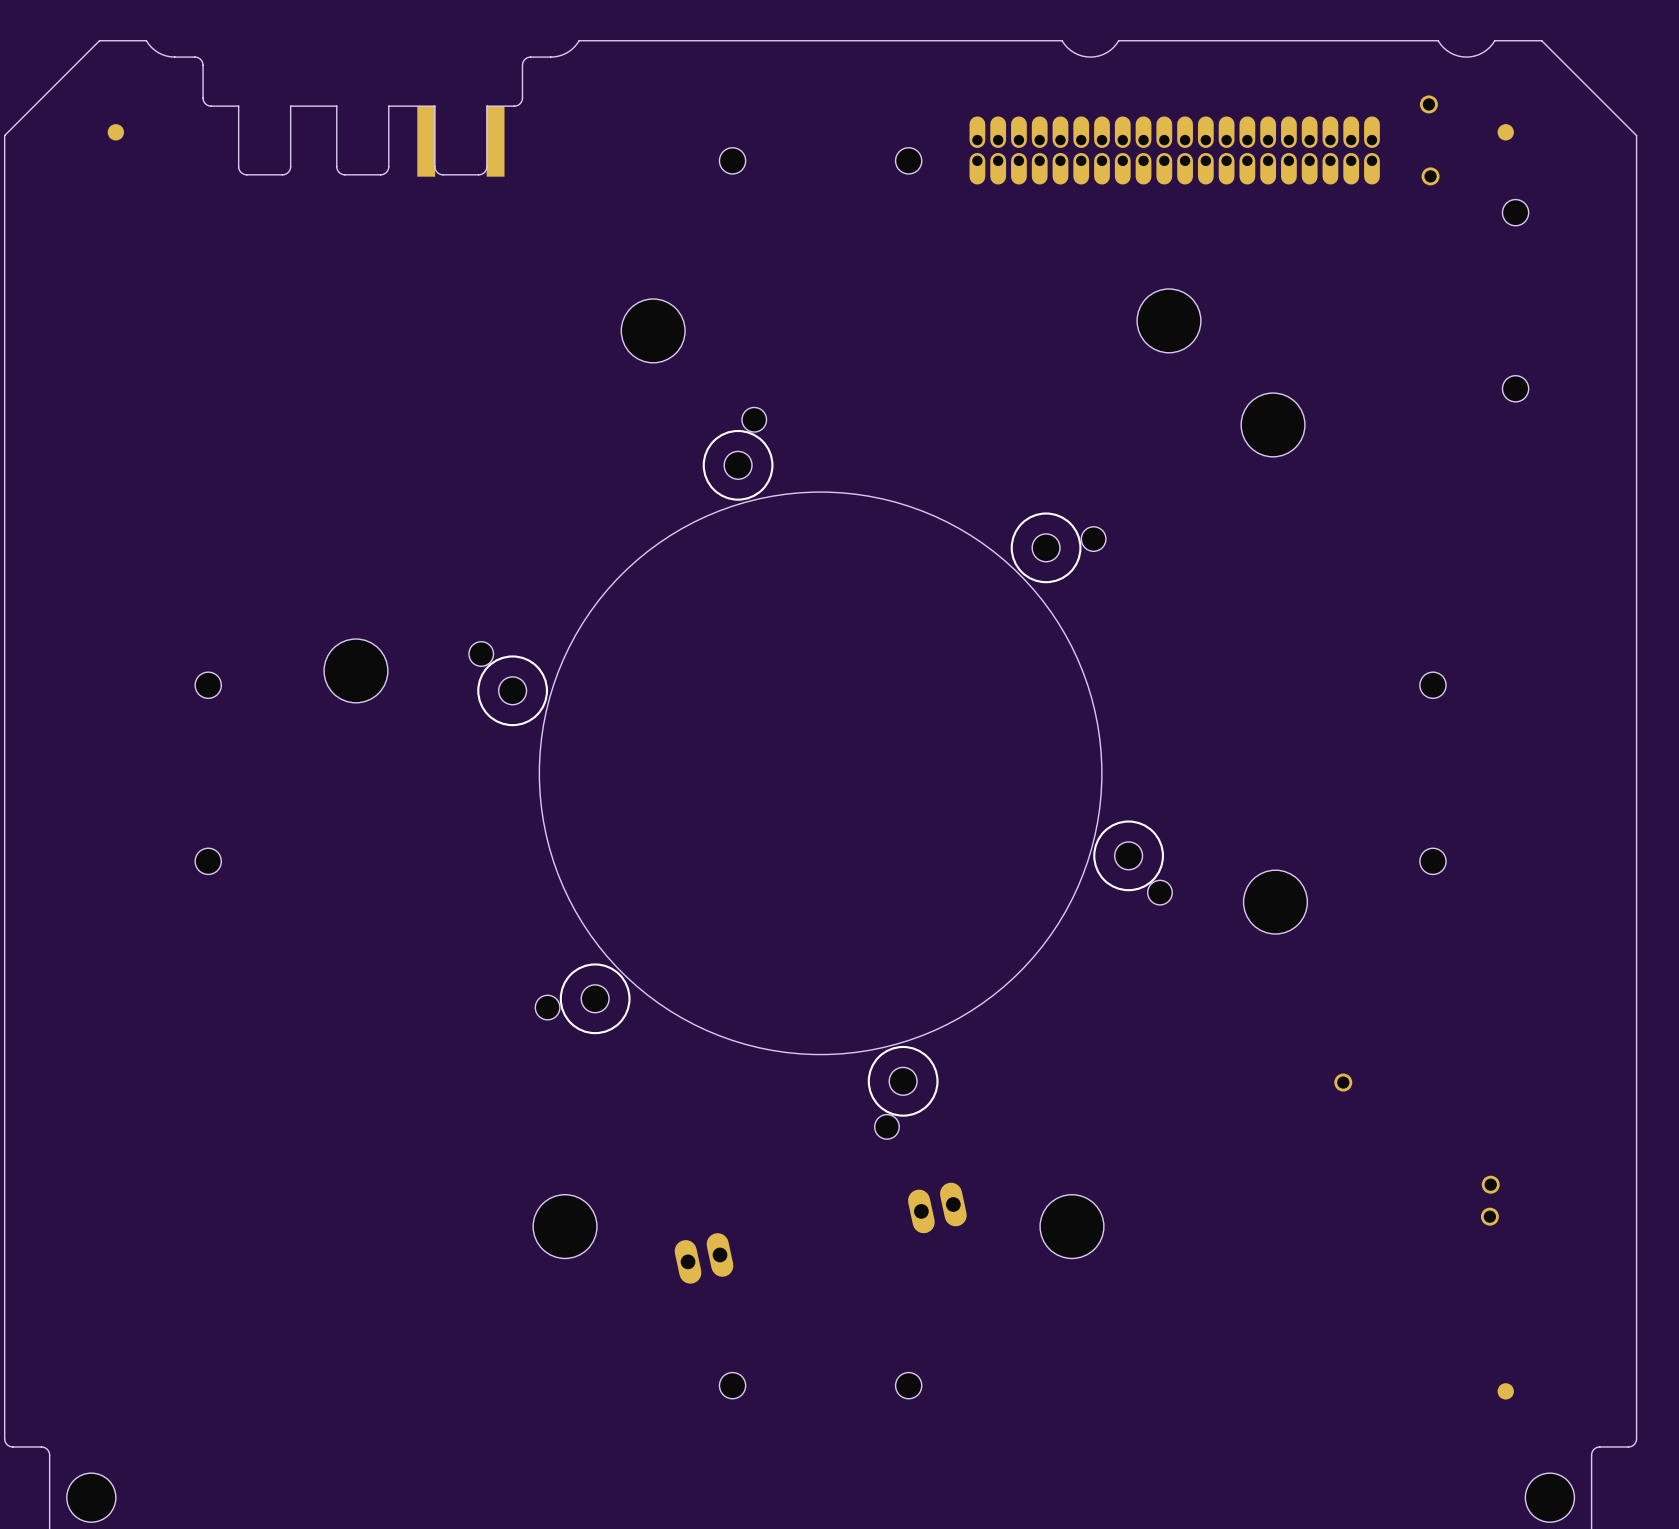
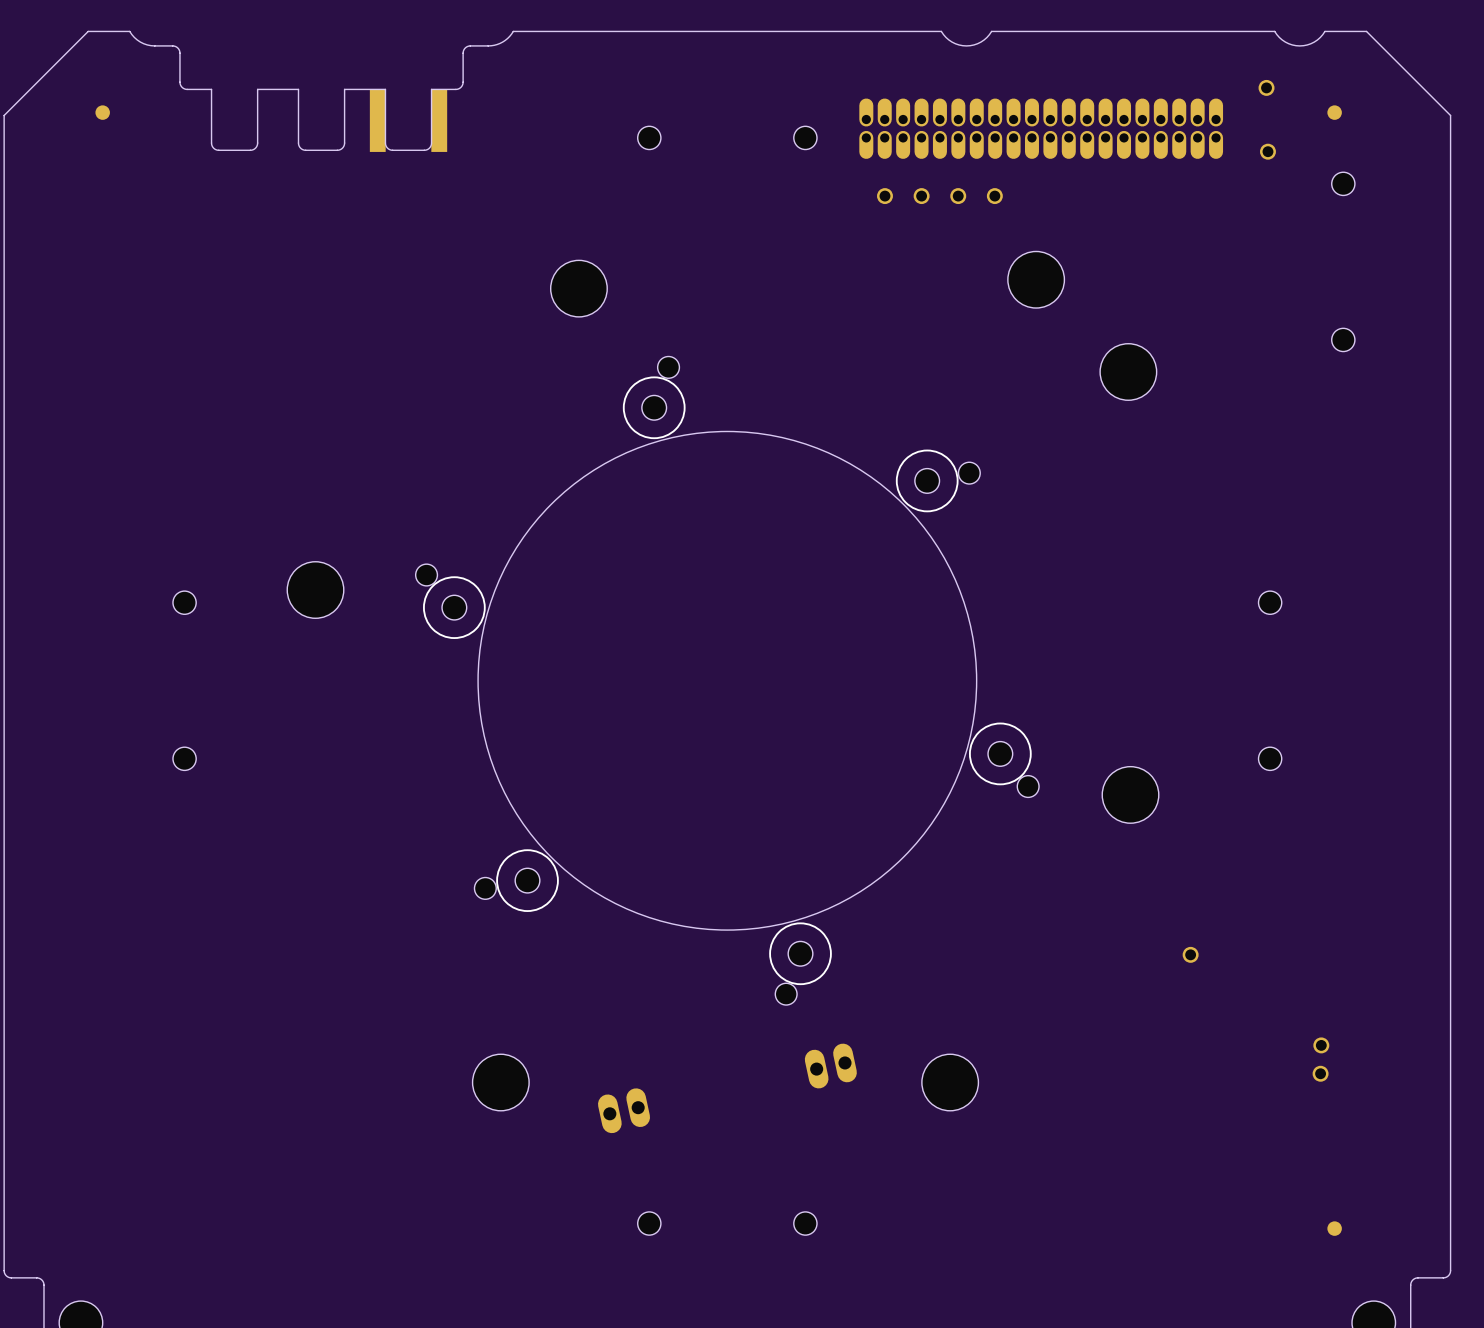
part: none -> (884, 196)
part: none -> (921, 196)
part: none -> (958, 196)
part: none -> (994, 196)

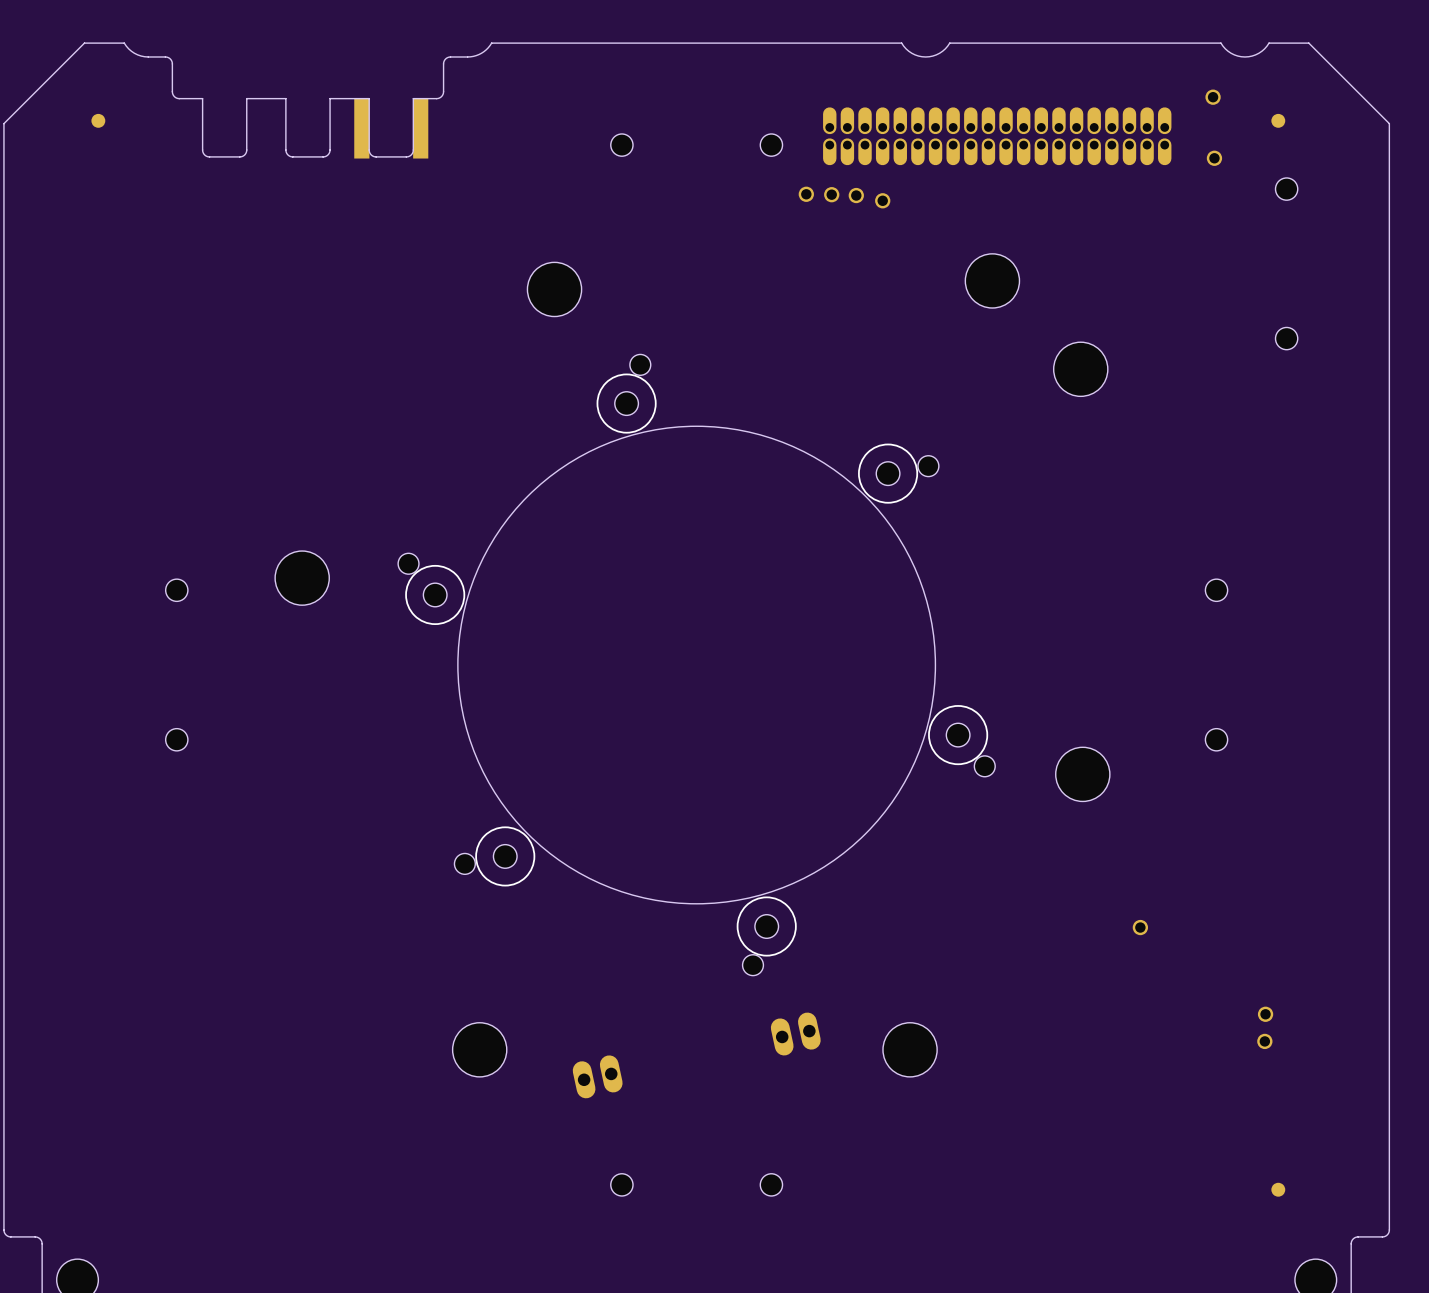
part: none -> (806, 194)
part: none -> (831, 194)
part: none -> (856, 195)
part: (884, 196) -> none
part: (958, 196) -> none
part: (994, 196) -> none

